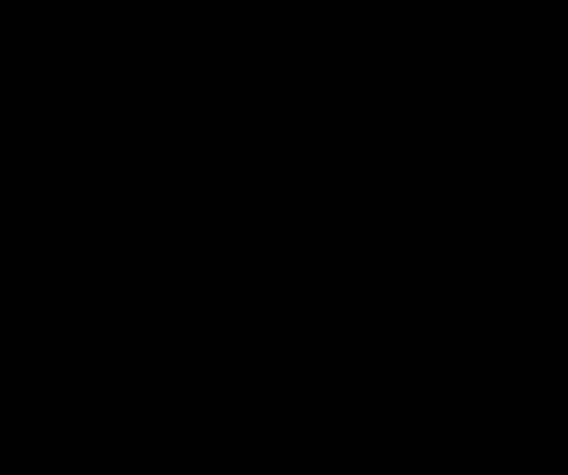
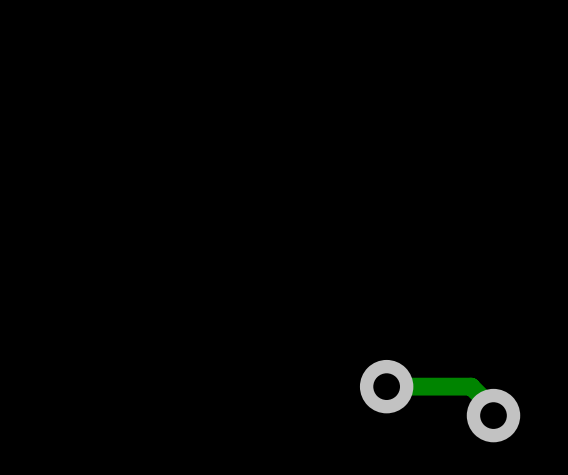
track: none -> (386, 386) (471, 386) (493, 408) (493, 415)
via: none -> (386, 386)
via: none -> (493, 415)

